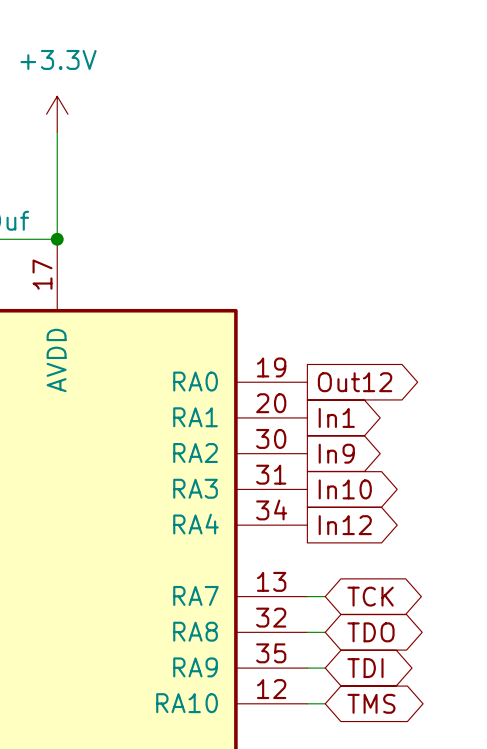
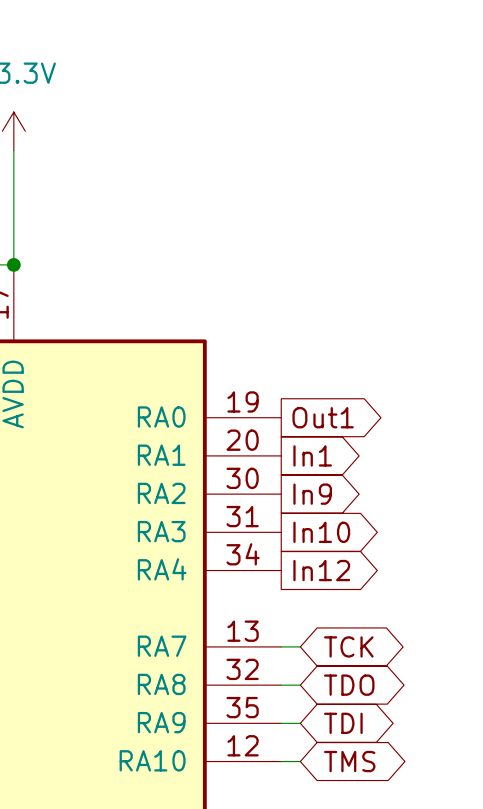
global label: Out12 (355, 382) -> Out1 (323, 417)

